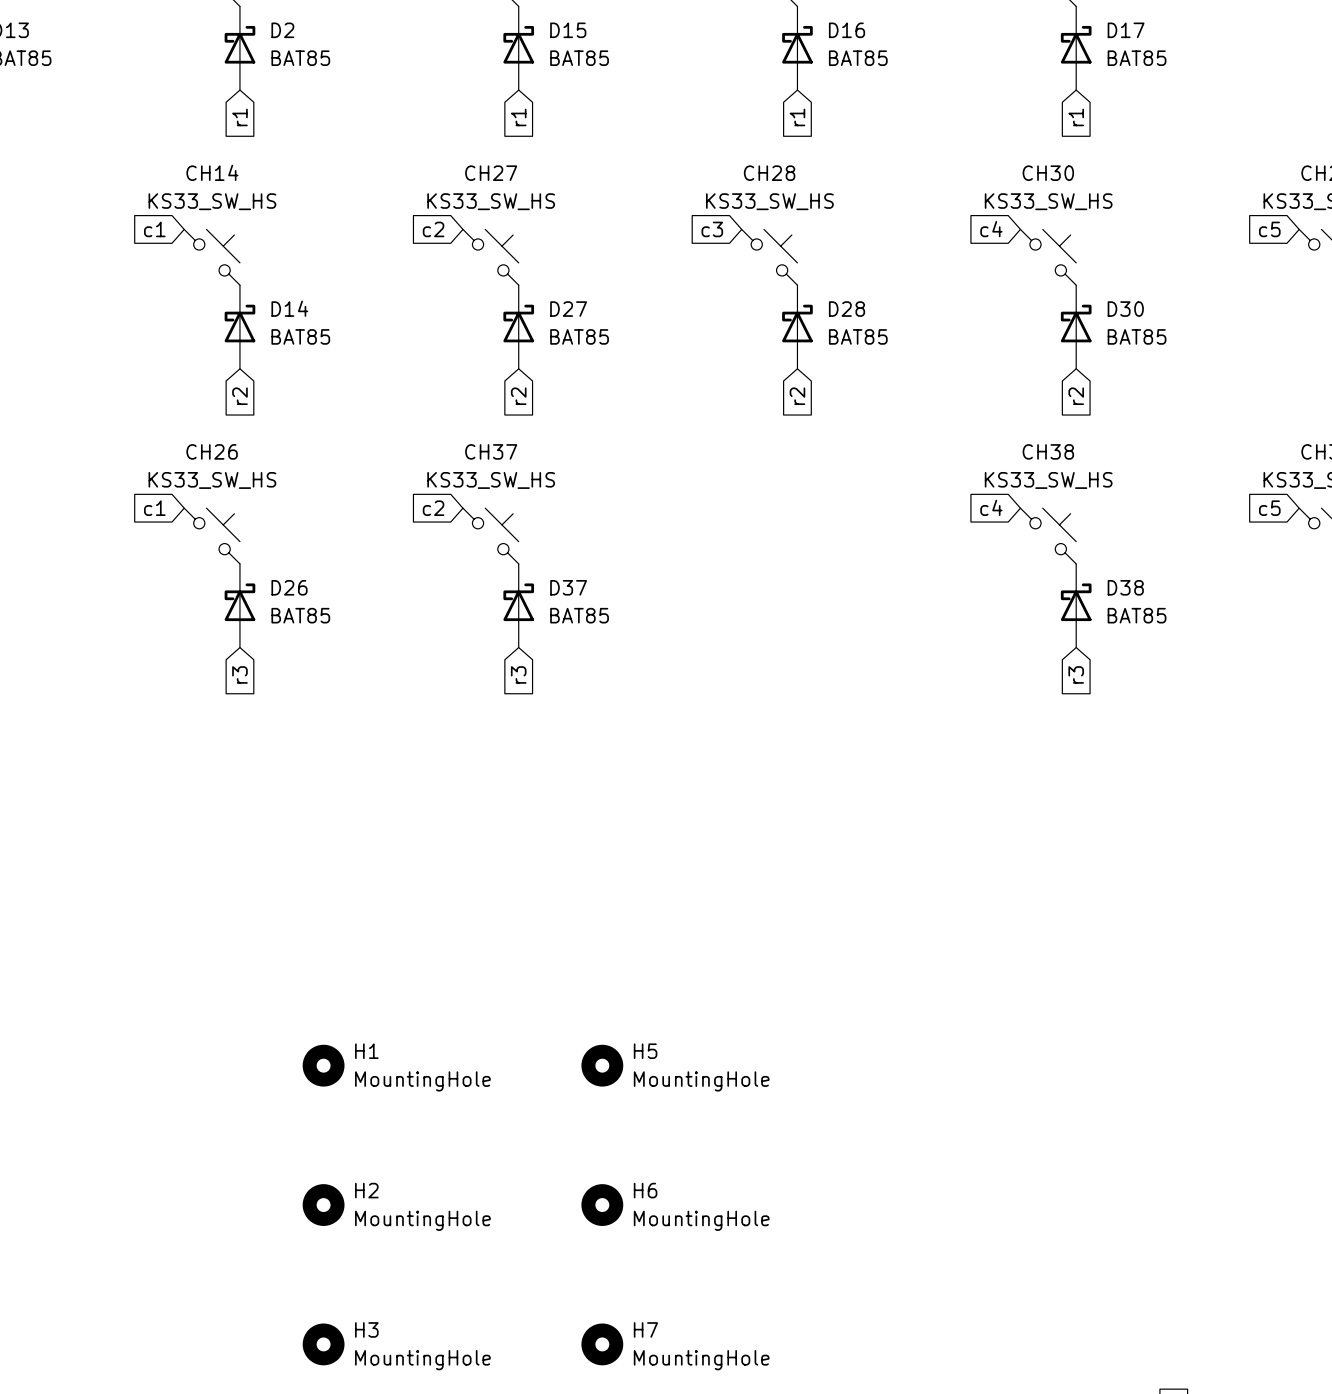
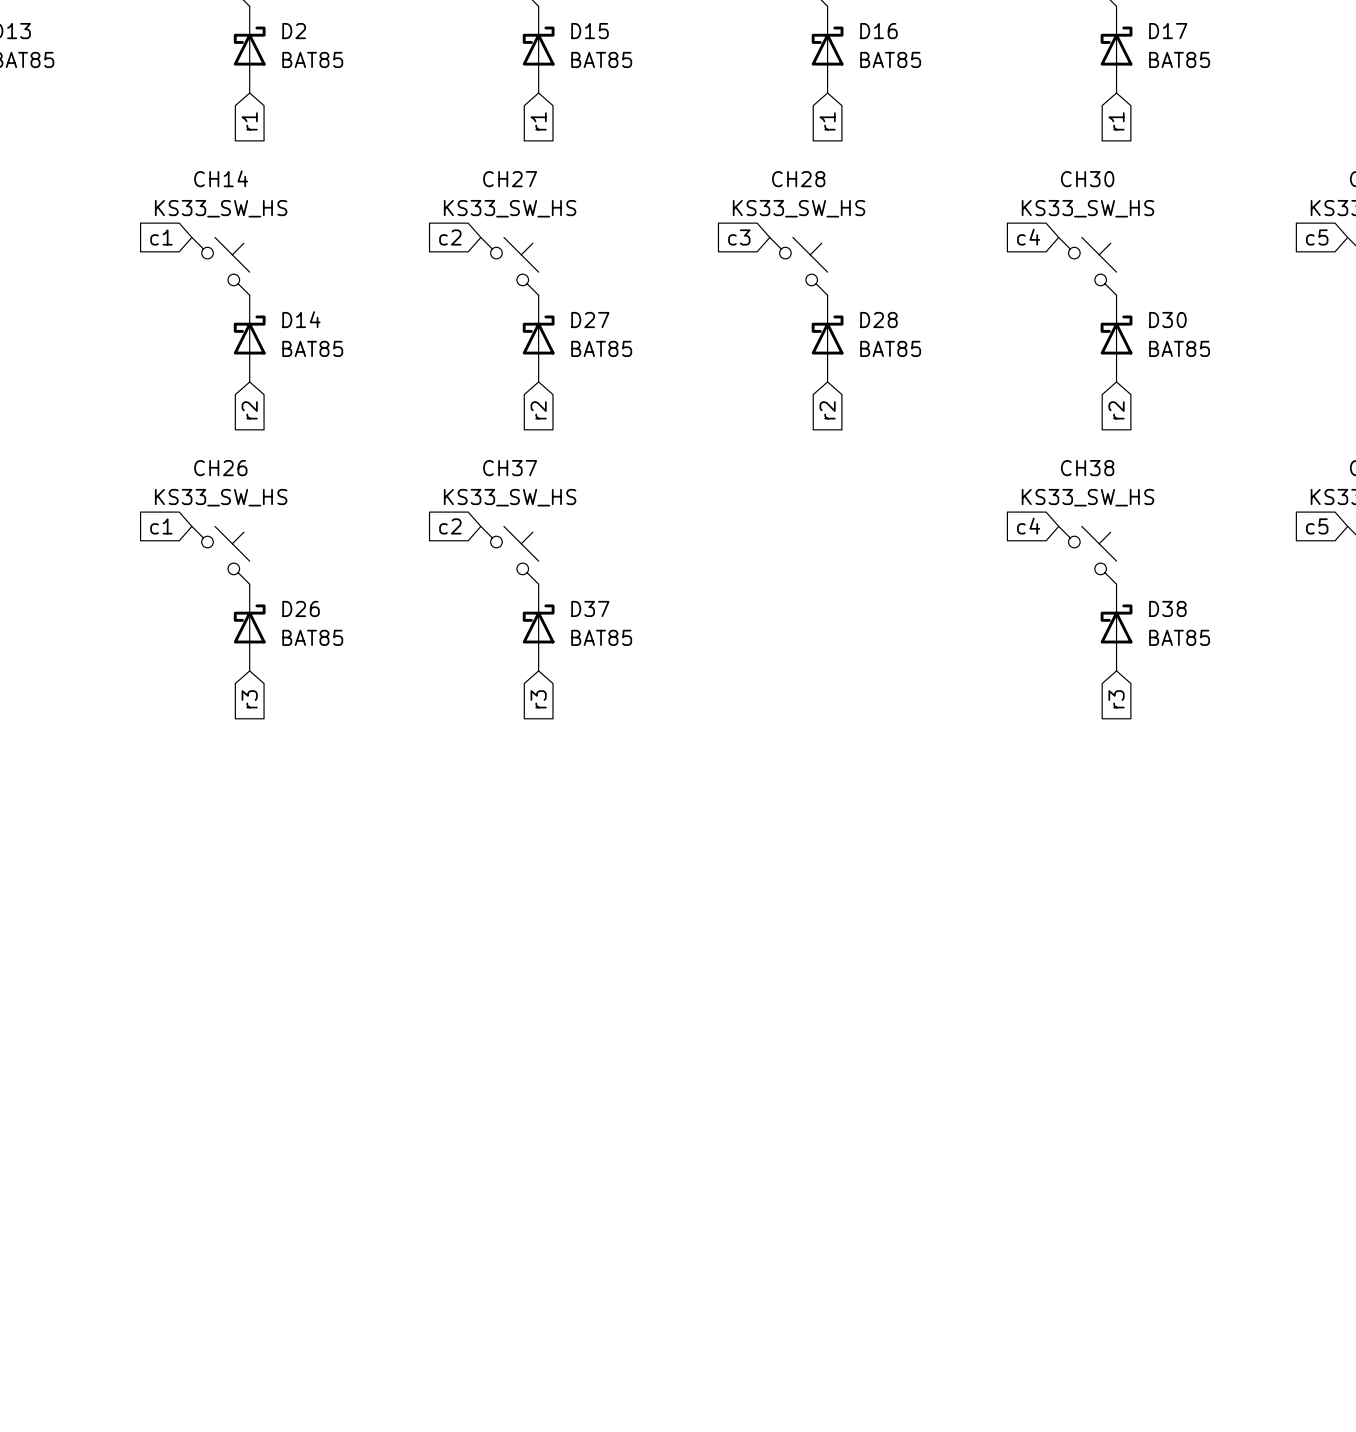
H1: MountingHole (323, 1065) -> none
H5: MountingHole (602, 1065) -> none
H2: MountingHole (323, 1205) -> none
H6: MountingHole (602, 1205) -> none
H3: MountingHole (323, 1344) -> none
H7: MountingHole (602, 1344) -> none

